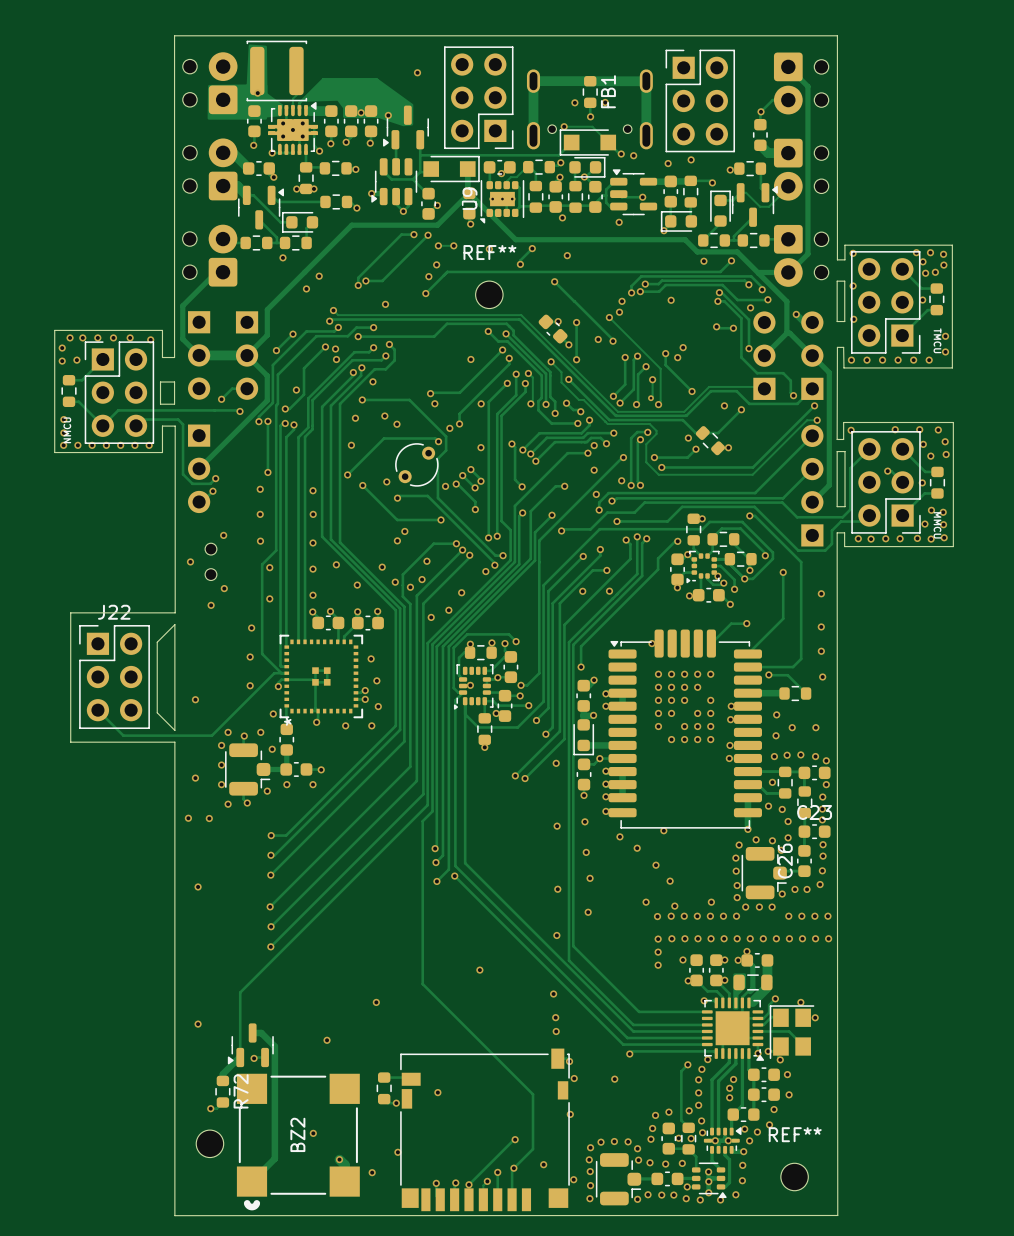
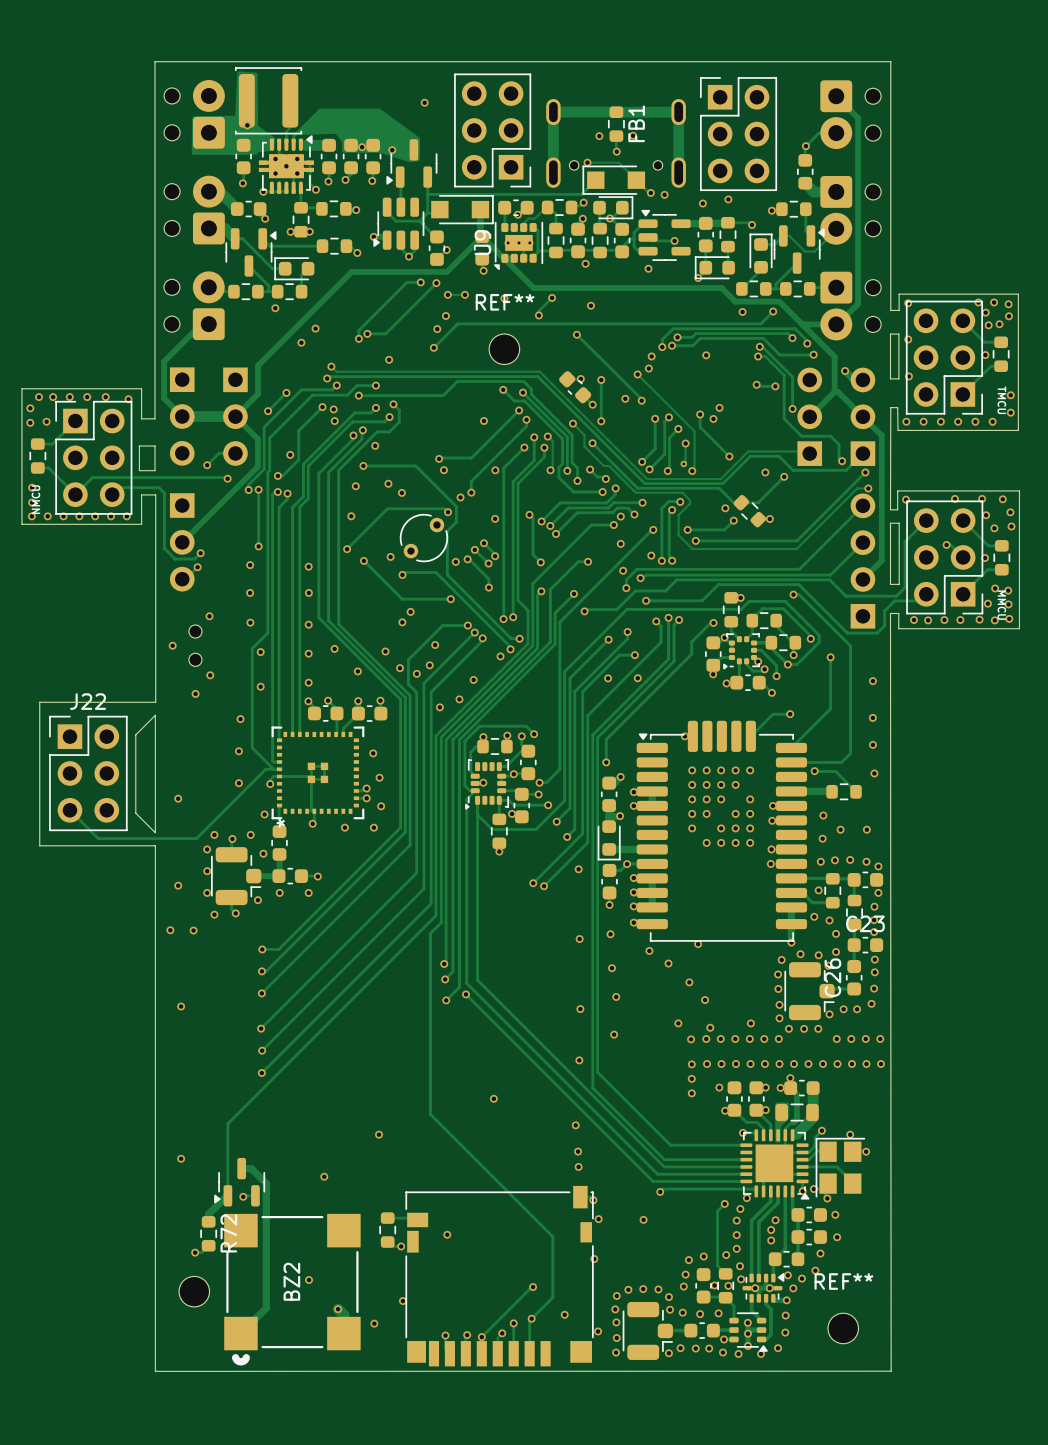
via: (750, 307) -> none

